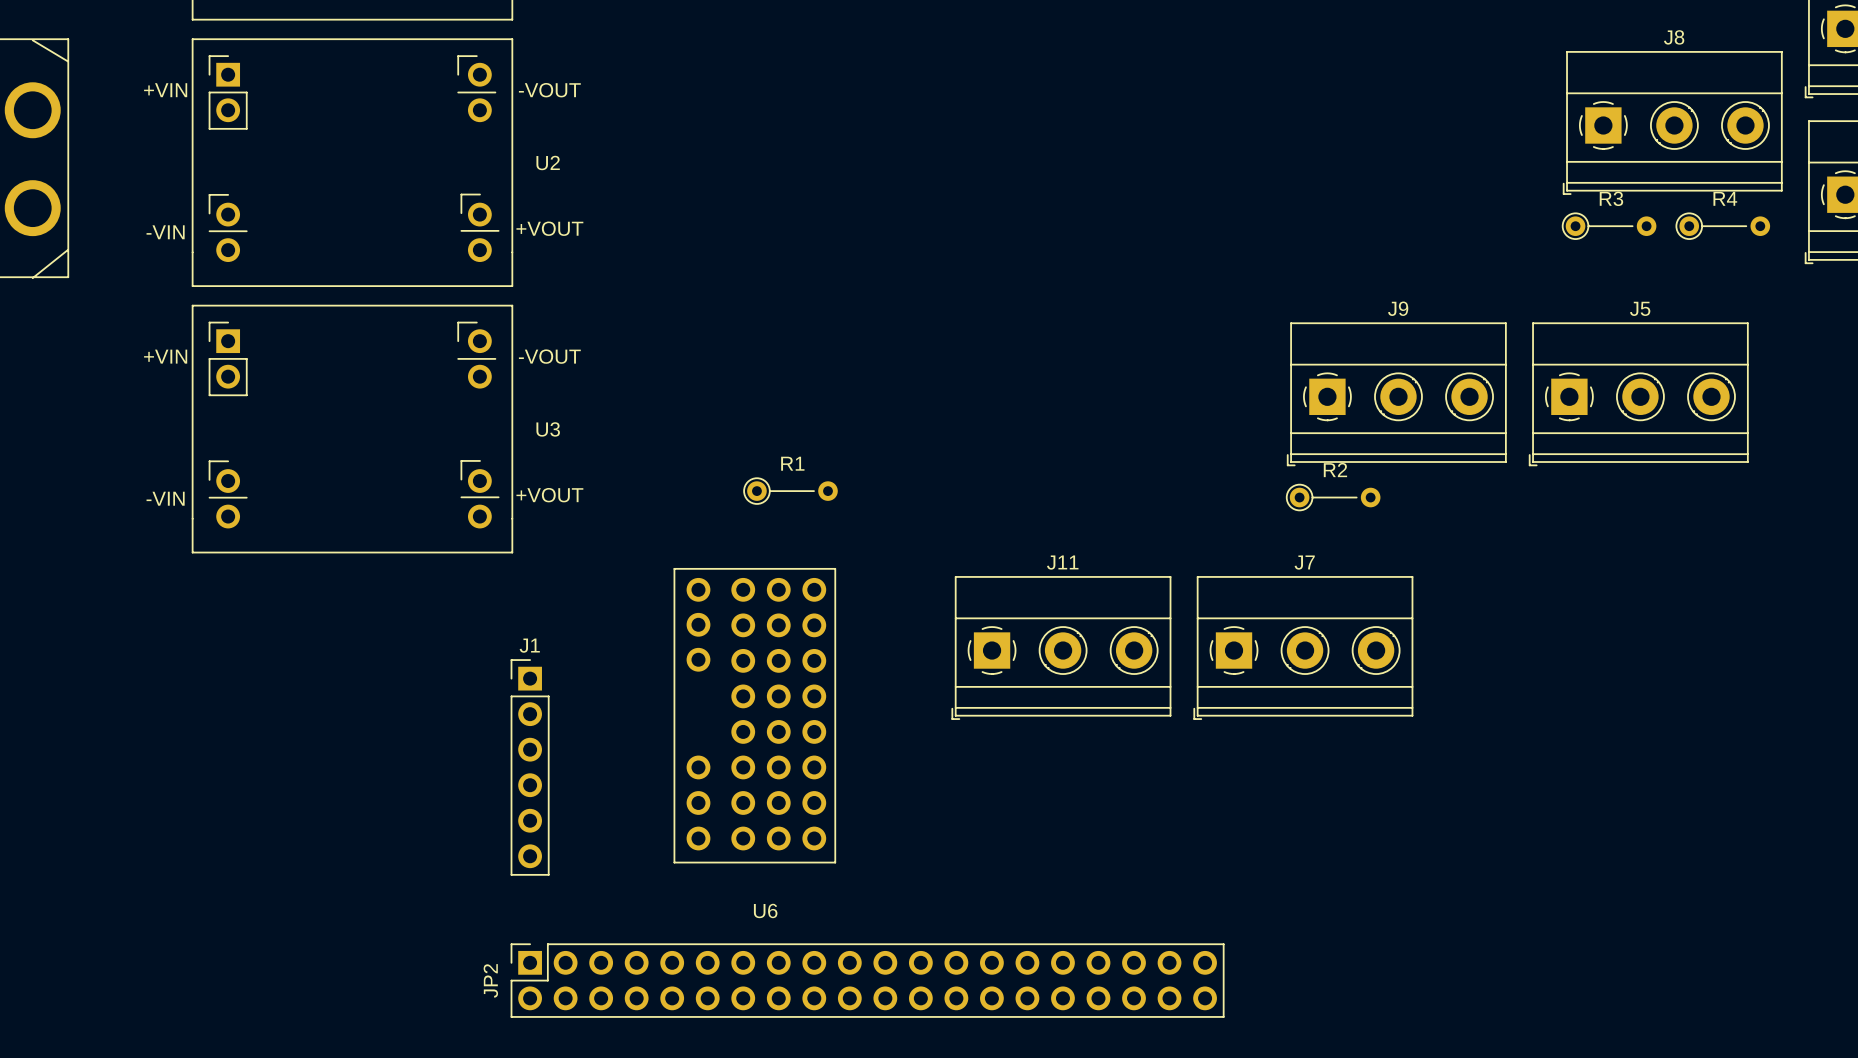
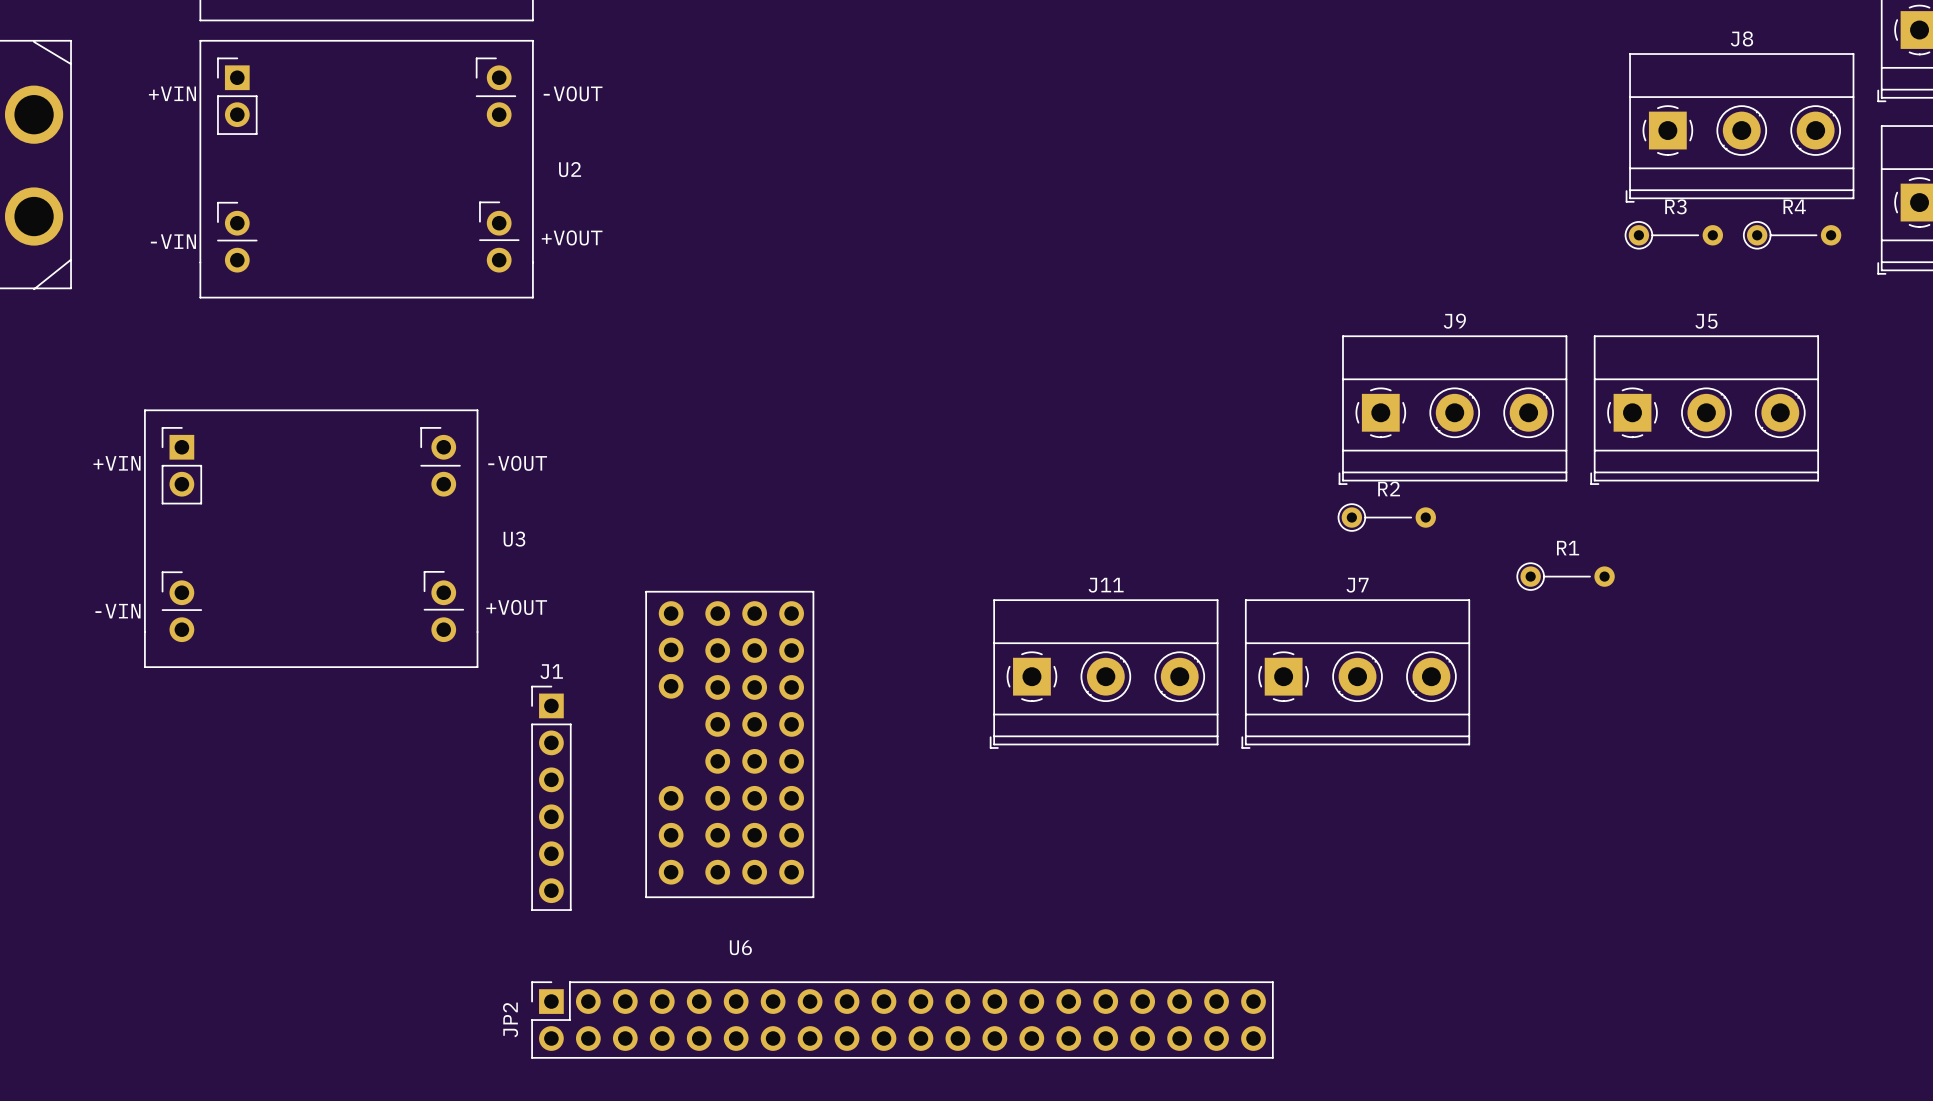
U3 position: (352, 429) -> (311, 538)
R1 position: (790, 491) -> (1565, 576)
U6 position: (754, 715) -> (729, 744)

